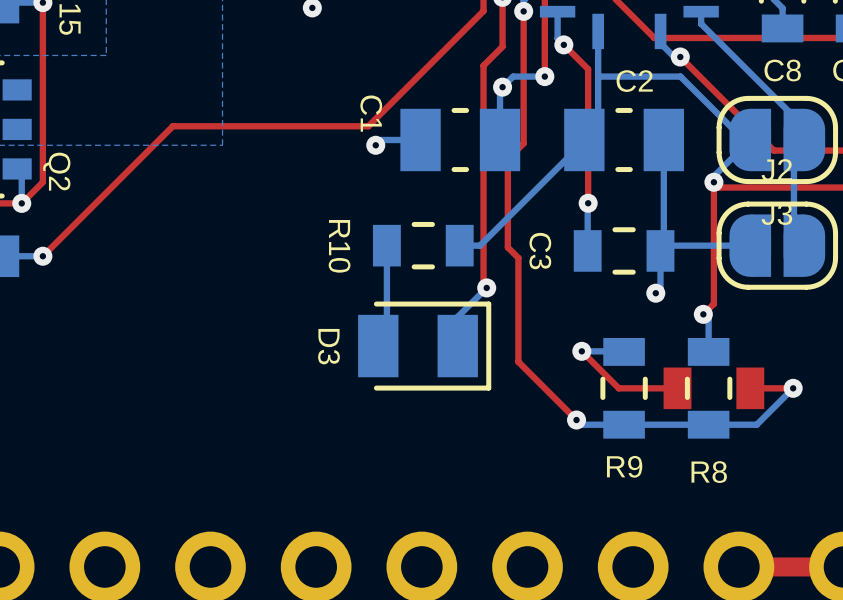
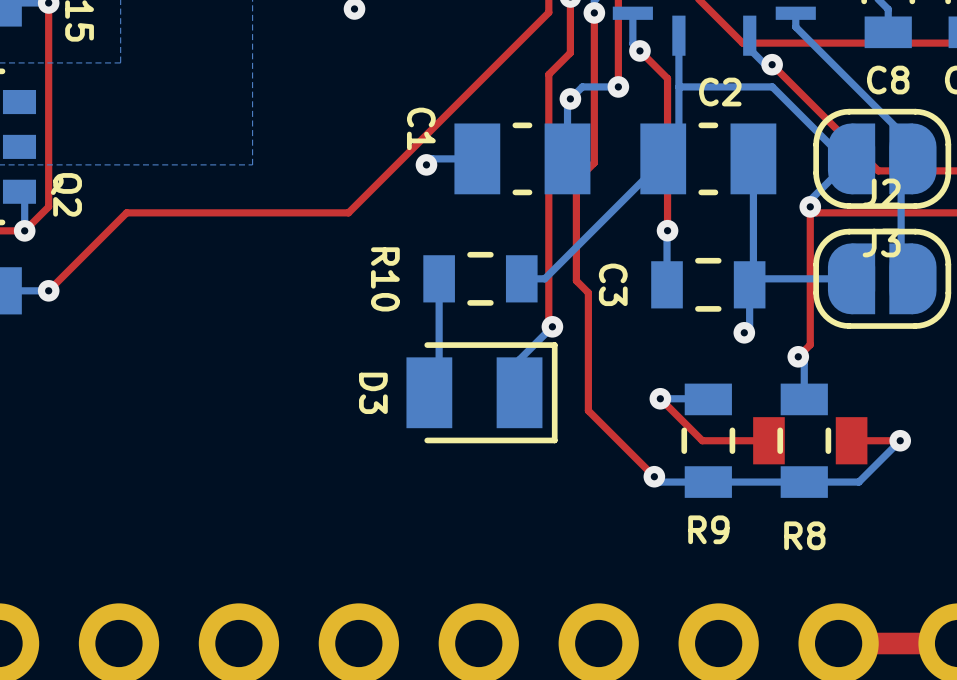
top track: (368, 126) (172, 126) (111, 187) -> (418, 143) (348, 212) (126, 212)

